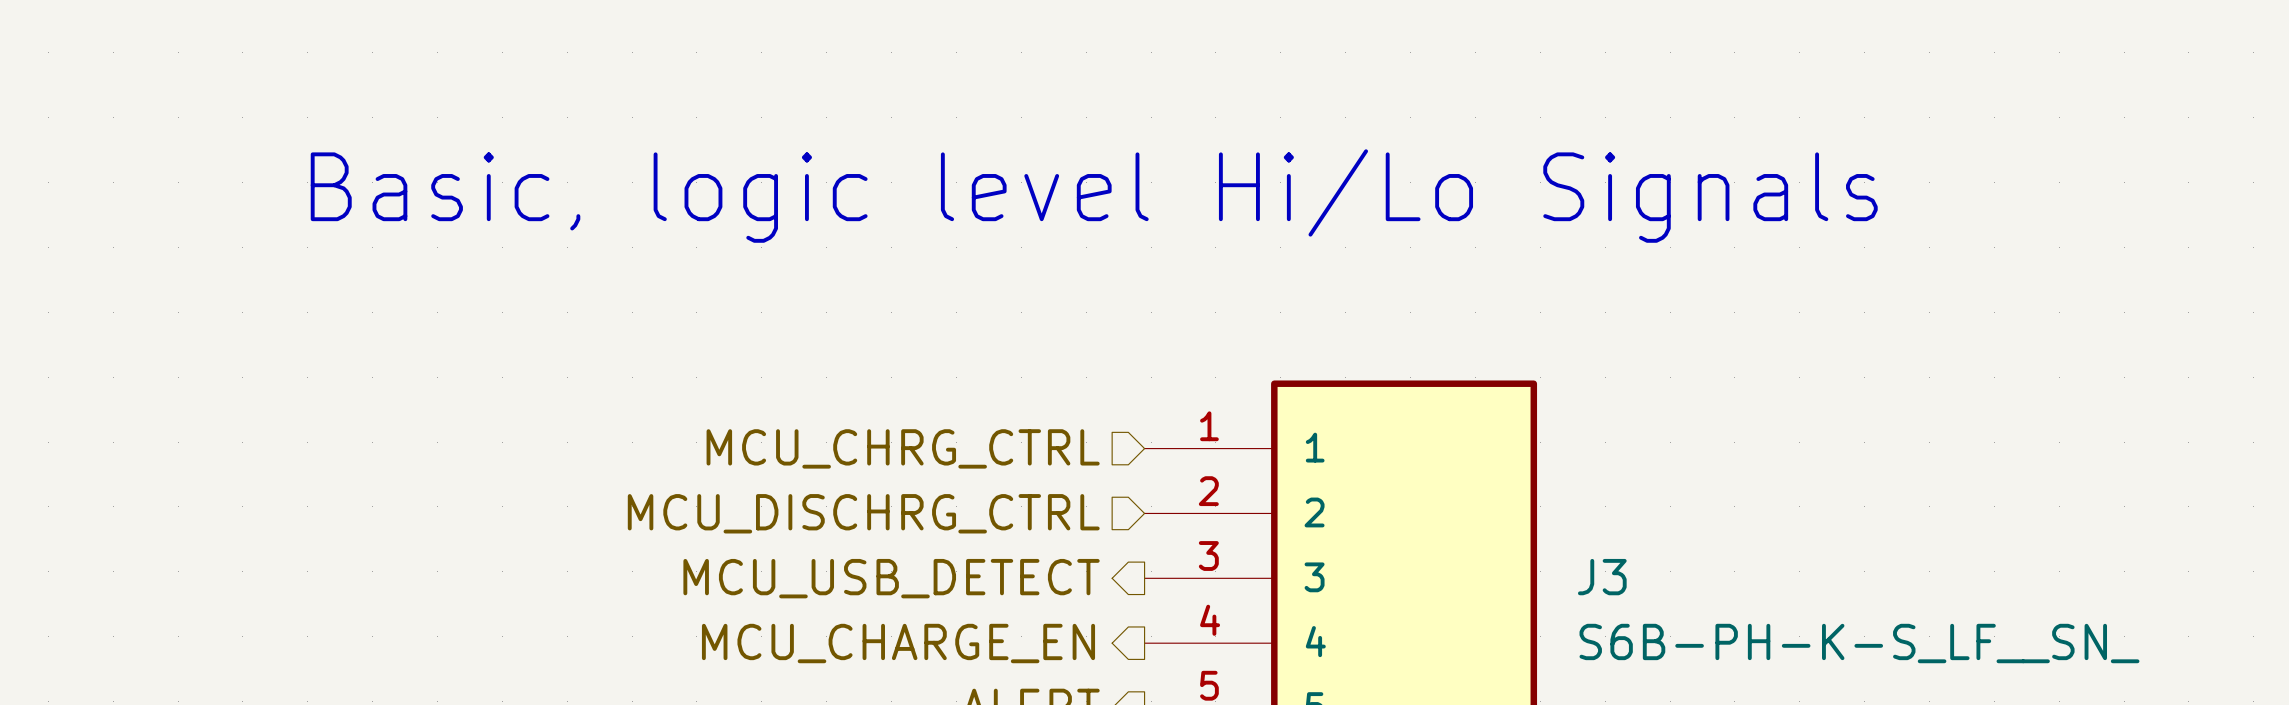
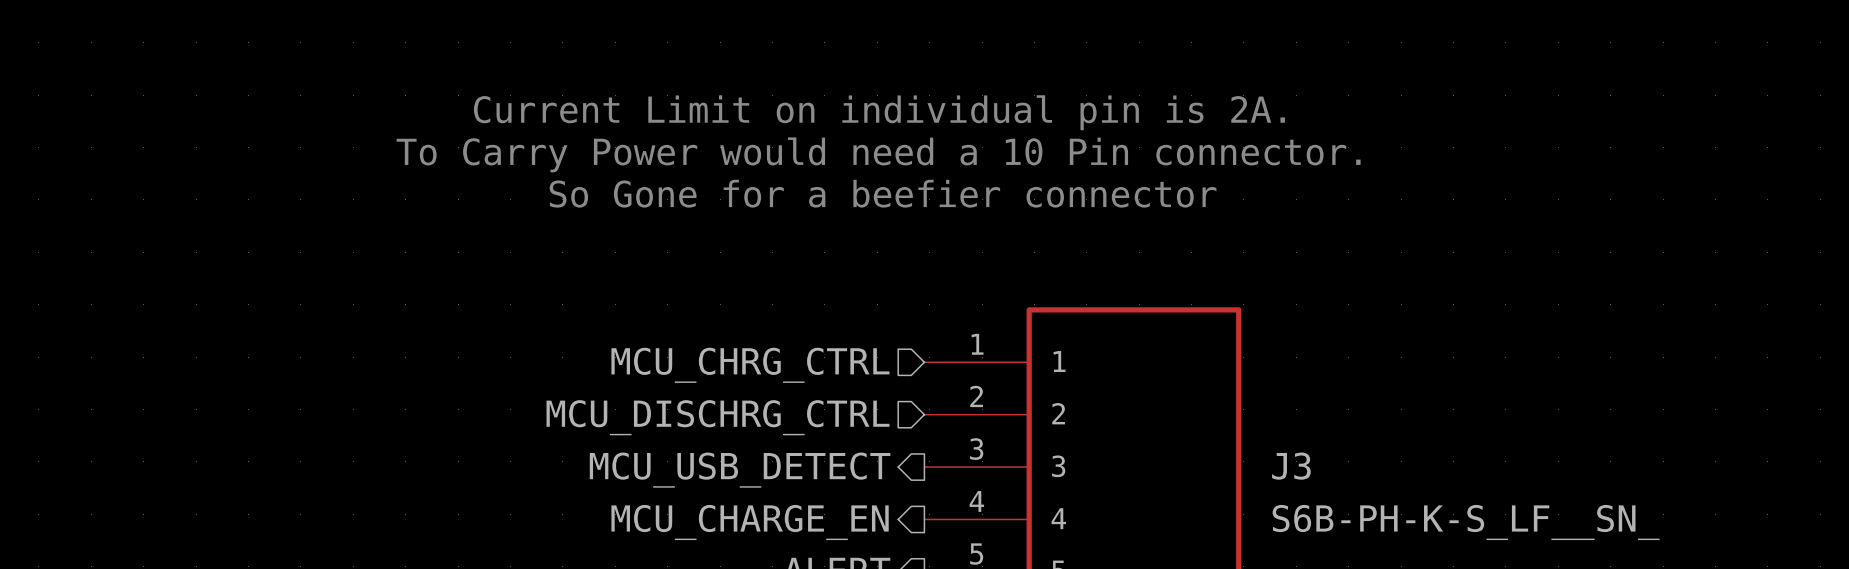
text: none -> Current Limit on individual pin is 2A. (879, 112)
text: Basic, logic level Hi/Lo Signals (1094, 196) -> To Carry Power would need a 10 Pin connector. (878, 154)
text: none -> So Gone for a beefier connector (883, 193)

